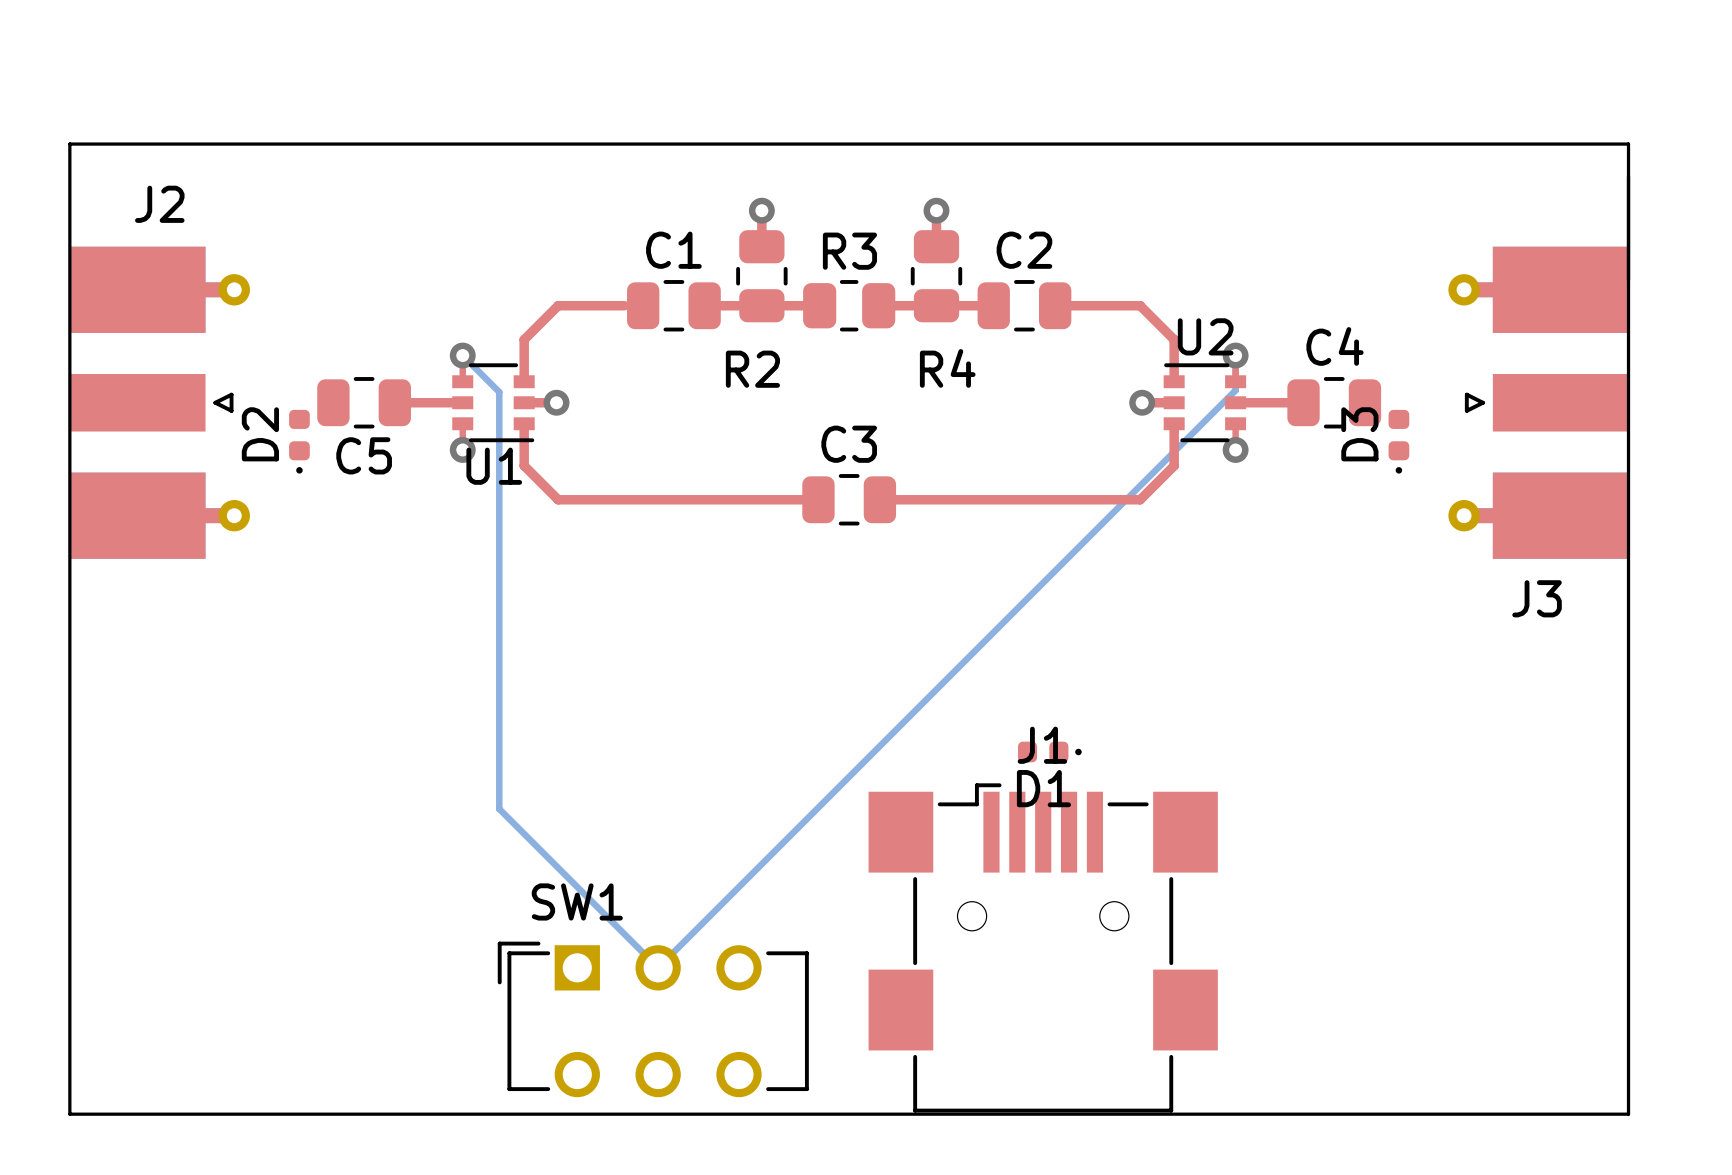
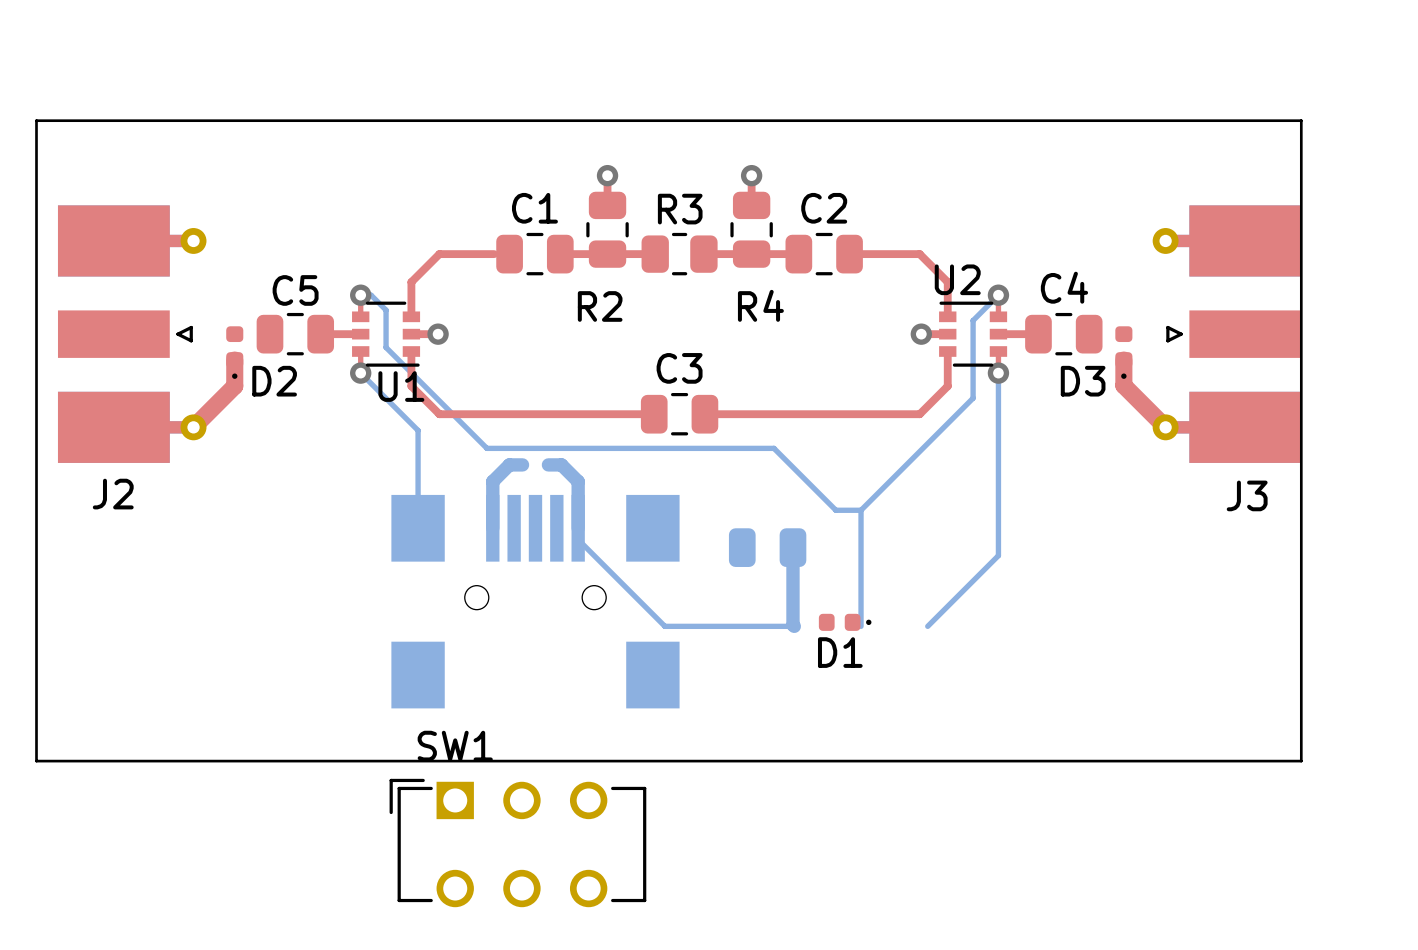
board edge: (1602, 144) (1628, 144) (1628, 1114) (69, 1114) (69, 920) -> (1301, 120) (1301, 761) (36, 761)
J2 name position: J2 (159, 204) -> J2 (113, 494)
U2 name position: U2 (1205, 336) -> U2 (957, 279)
bottom track: (462, 355) (499, 392) (499, 808) (658, 967) (1235, 390) (1235, 355) -> (360, 295) (371, 295) (386, 310) (386, 347) (486, 448) (773, 448) (835, 510) (861, 510)
bottom track: none -> (998, 295) (973, 320) (973, 398) (861, 510)
J2 position: (159, 402) -> (132, 334)
C5 position: (364, 402) -> (295, 334)
C4 position: (1334, 402) -> (1063, 334)
J3 position: (1538, 402) -> (1226, 334)
D2 name rotation: 0° (260, 434) -> 90° clockwise (274, 381)
D2 name position: D2 (260, 434) -> D2 (274, 381)
top track: none -> (234, 360) (234, 386) (193, 427)
D3 name rotation: 0° (1359, 434) -> 90° clockwise (1083, 381)
top track: none -> (1123, 360) (1123, 385) (1165, 427)
D2 position: (299, 441) -> (234, 352)
D3 position: (1398, 441) -> (1123, 352)
bottom track: none -> (360, 373) (418, 430) (418, 528)
bottom track: none -> (998, 373) (998, 555) (927, 626)
C5 name position: C5 (364, 455) -> C5 (295, 290)
U1 name position: U1 (494, 466) -> U1 (401, 386)
bottom track: none -> (522, 464) (509, 464) (492, 481) (492, 528)
bottom track: none -> (548, 464) (561, 464) (578, 481) (578, 539) (664, 626) (794, 626) (792, 547)
bottom track: none -> (861, 510) (861, 626)
part: none -> (767, 547)
J1 side: top (1043, 947) -> bottom (535, 601)

